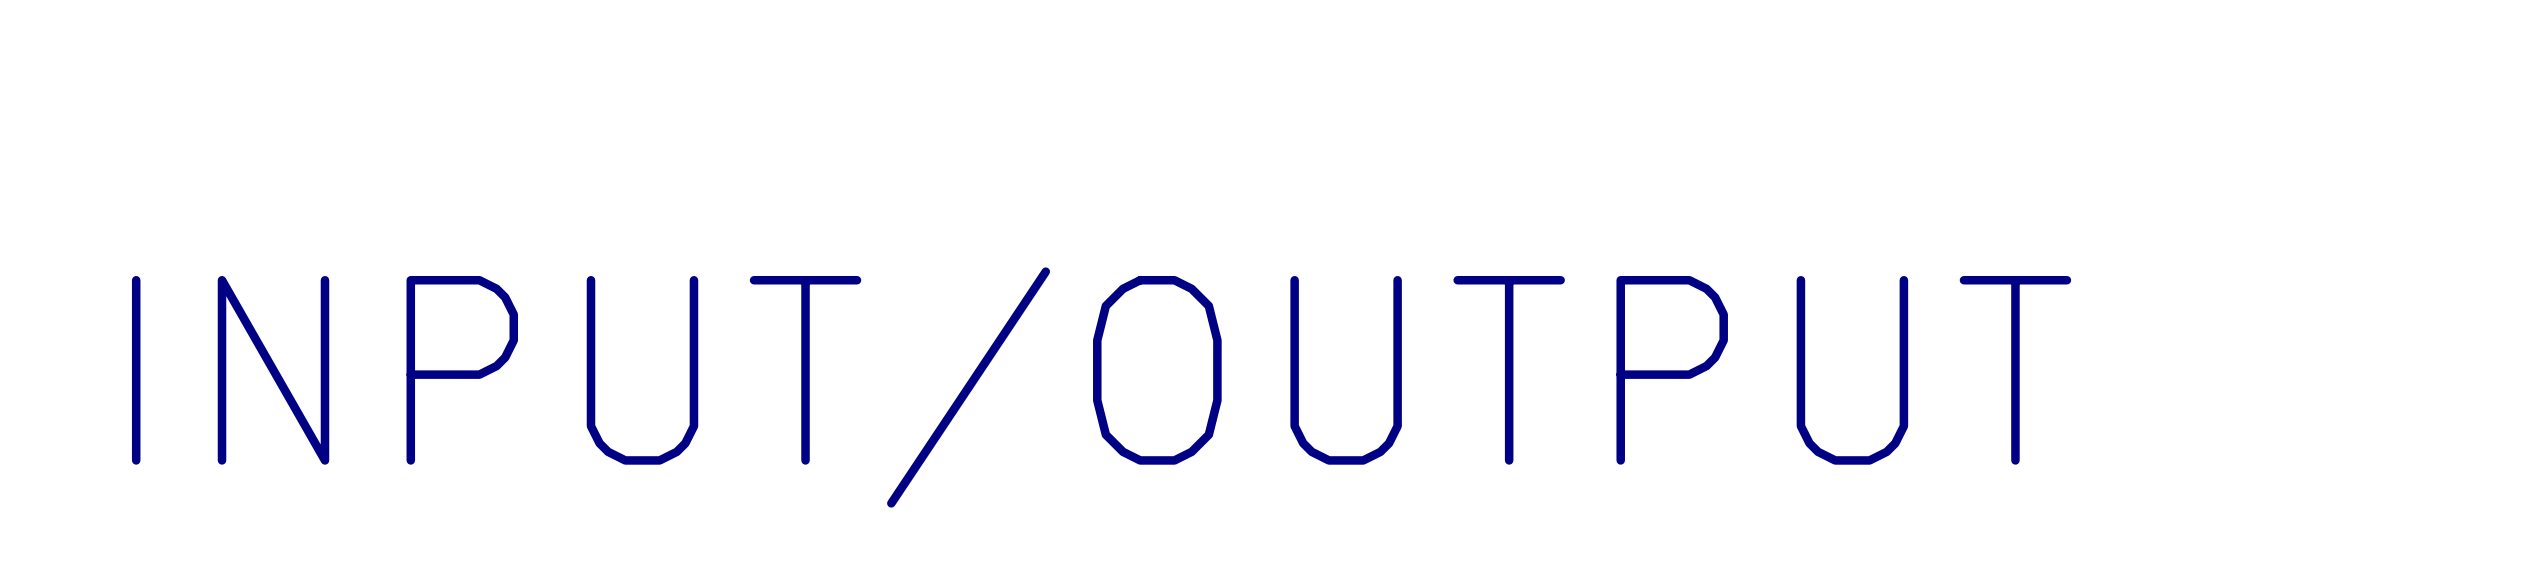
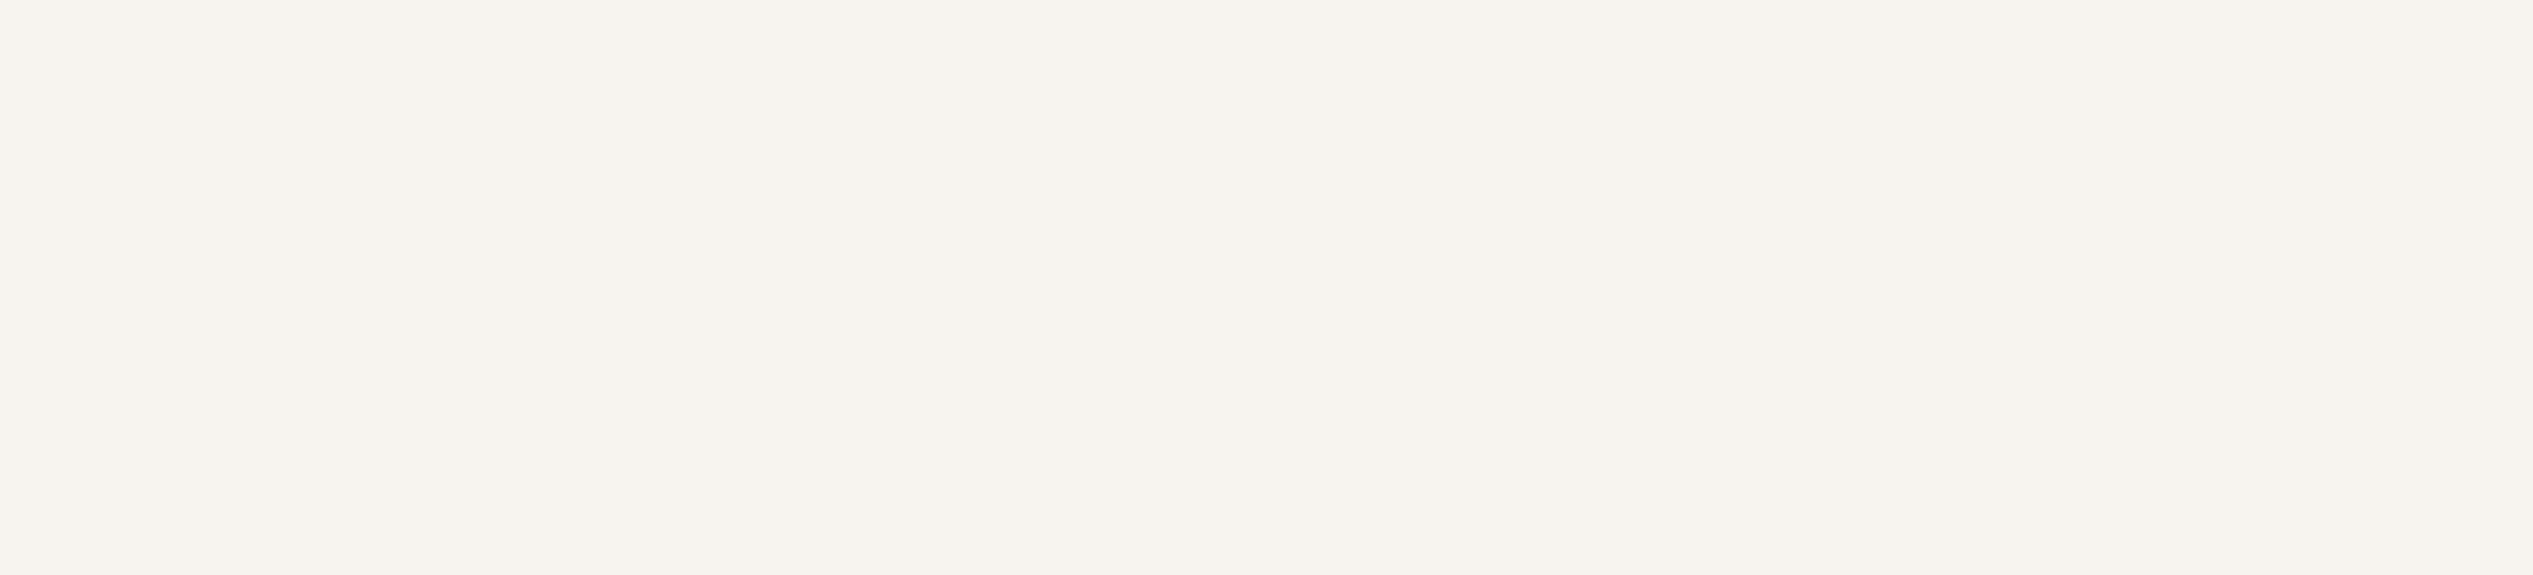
text: INPUT/OUTPUT (1101, 387) -> none

